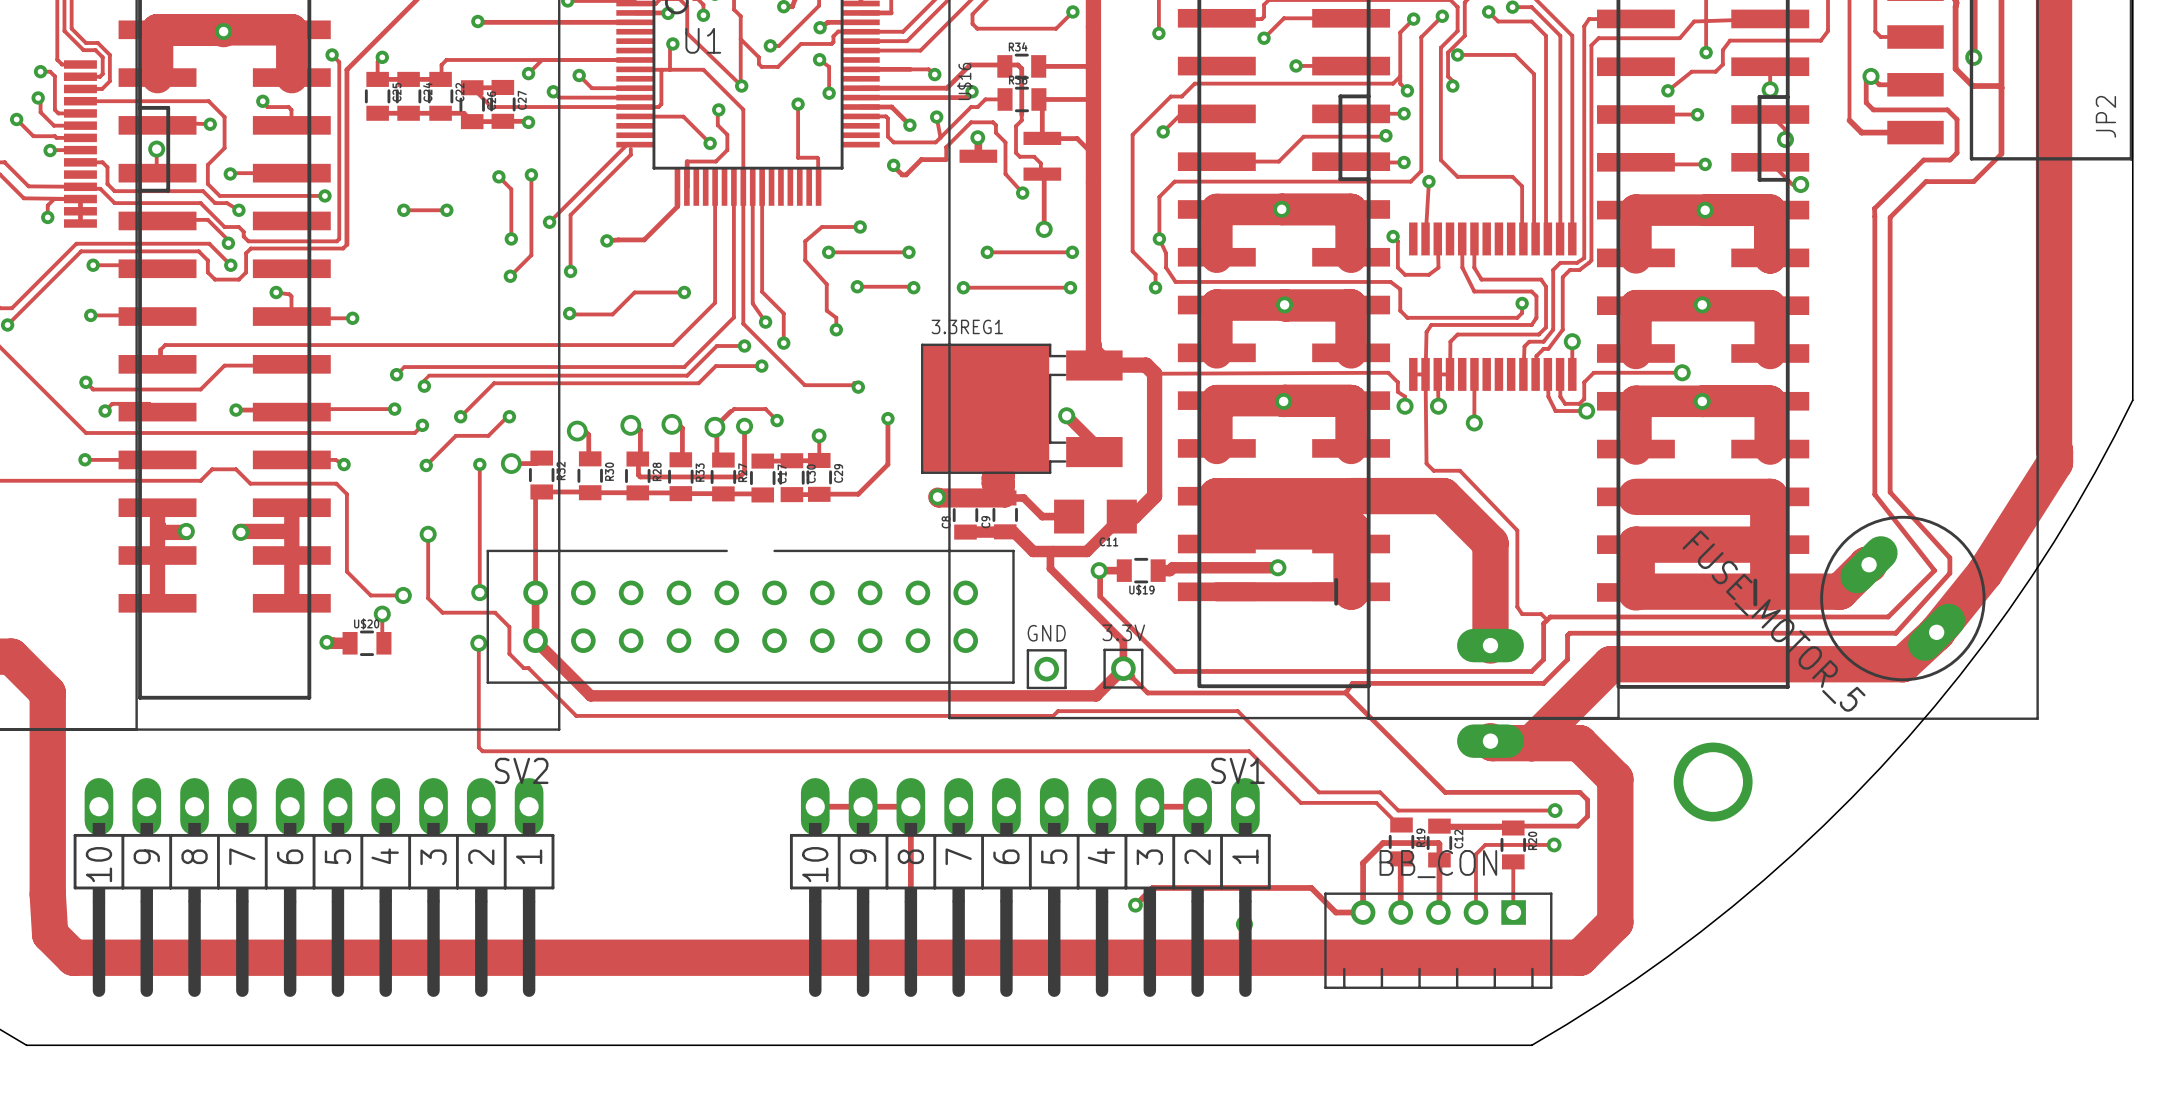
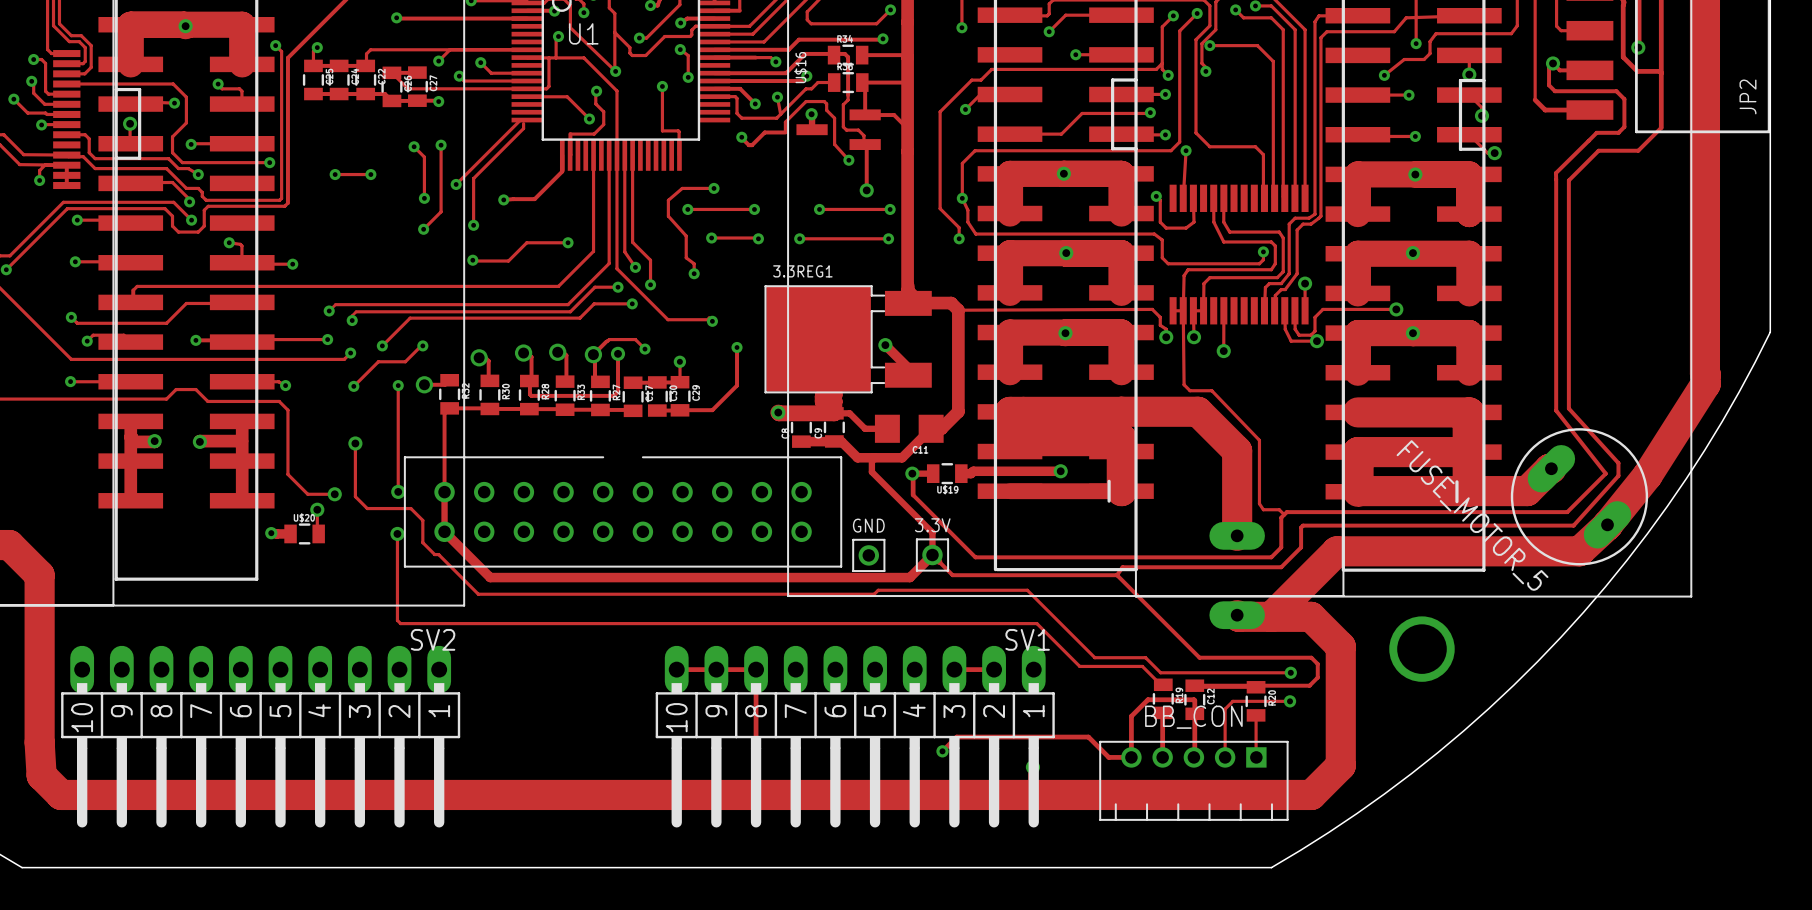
track: none -> (882, 38) (798, 39) (788, 49) (714, 49)
via: none -> (882, 38)

